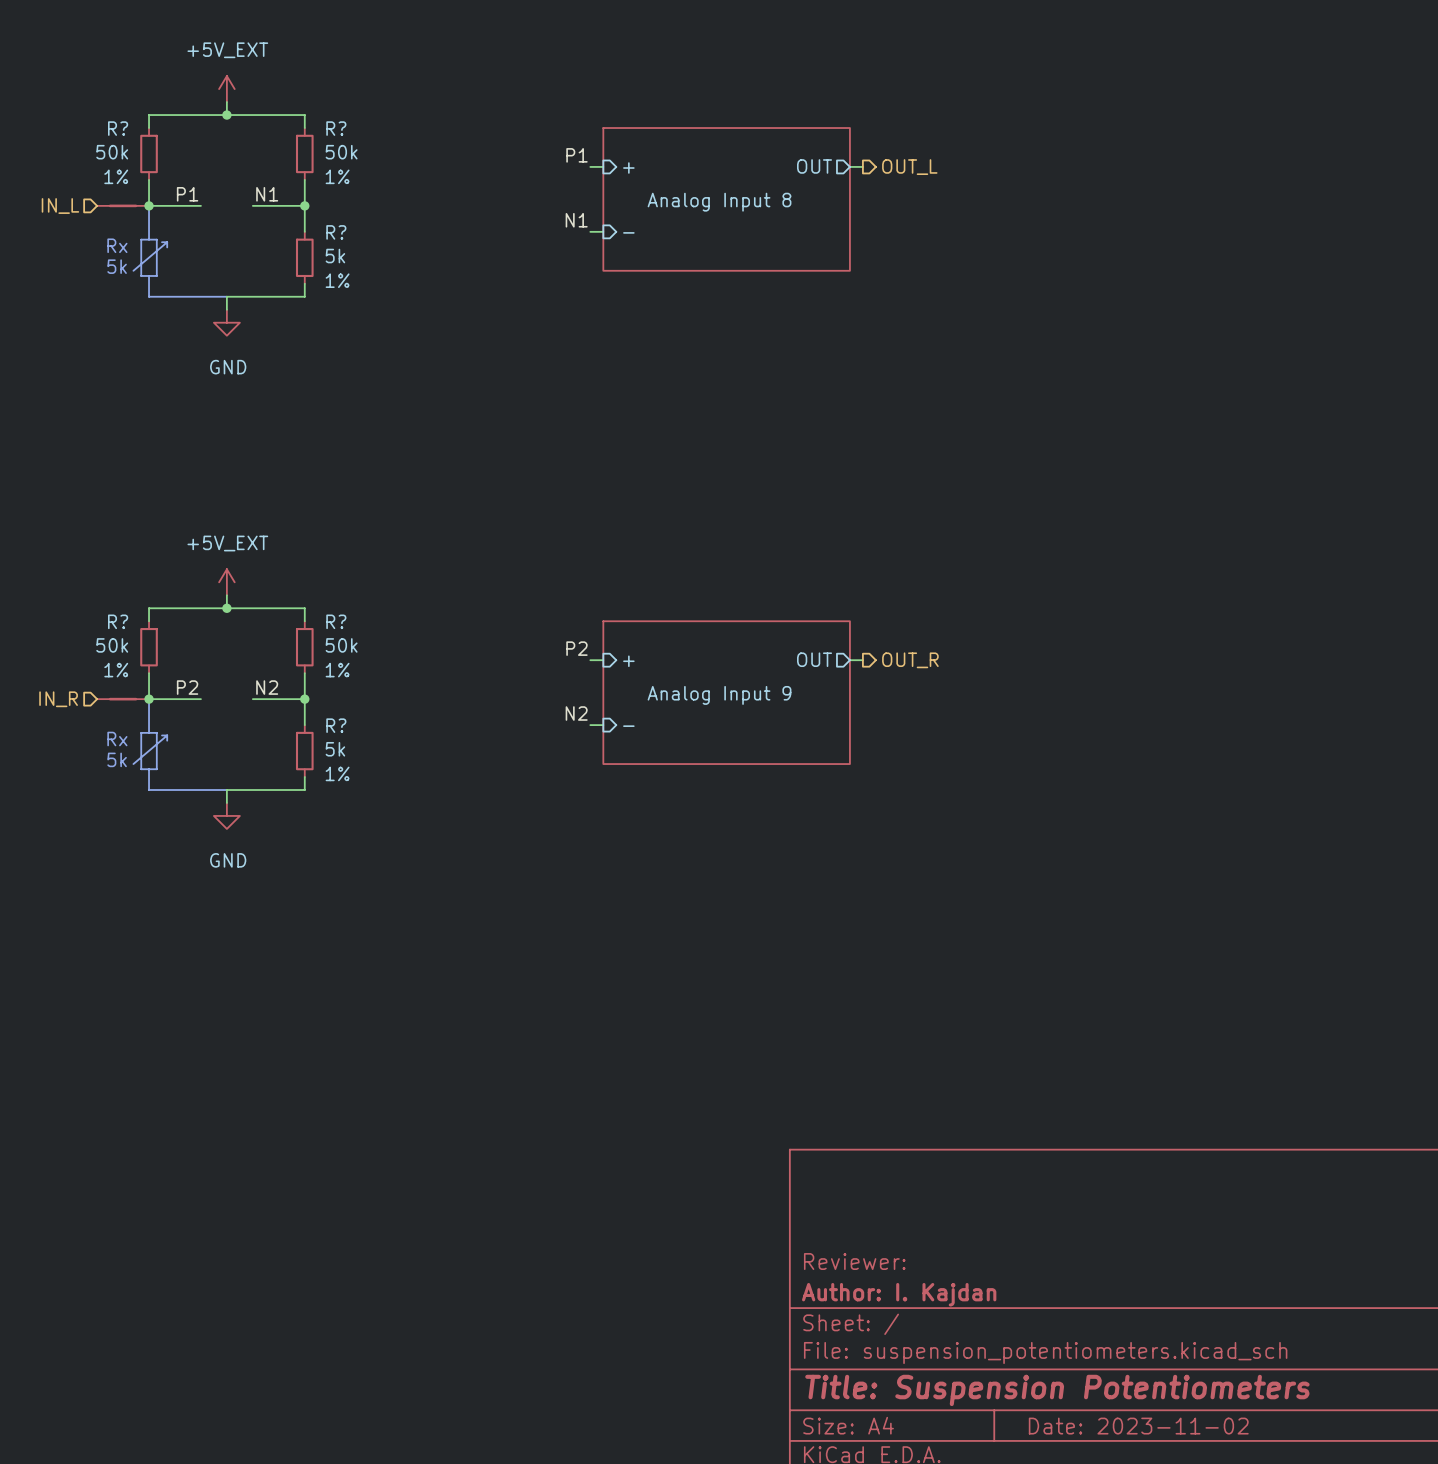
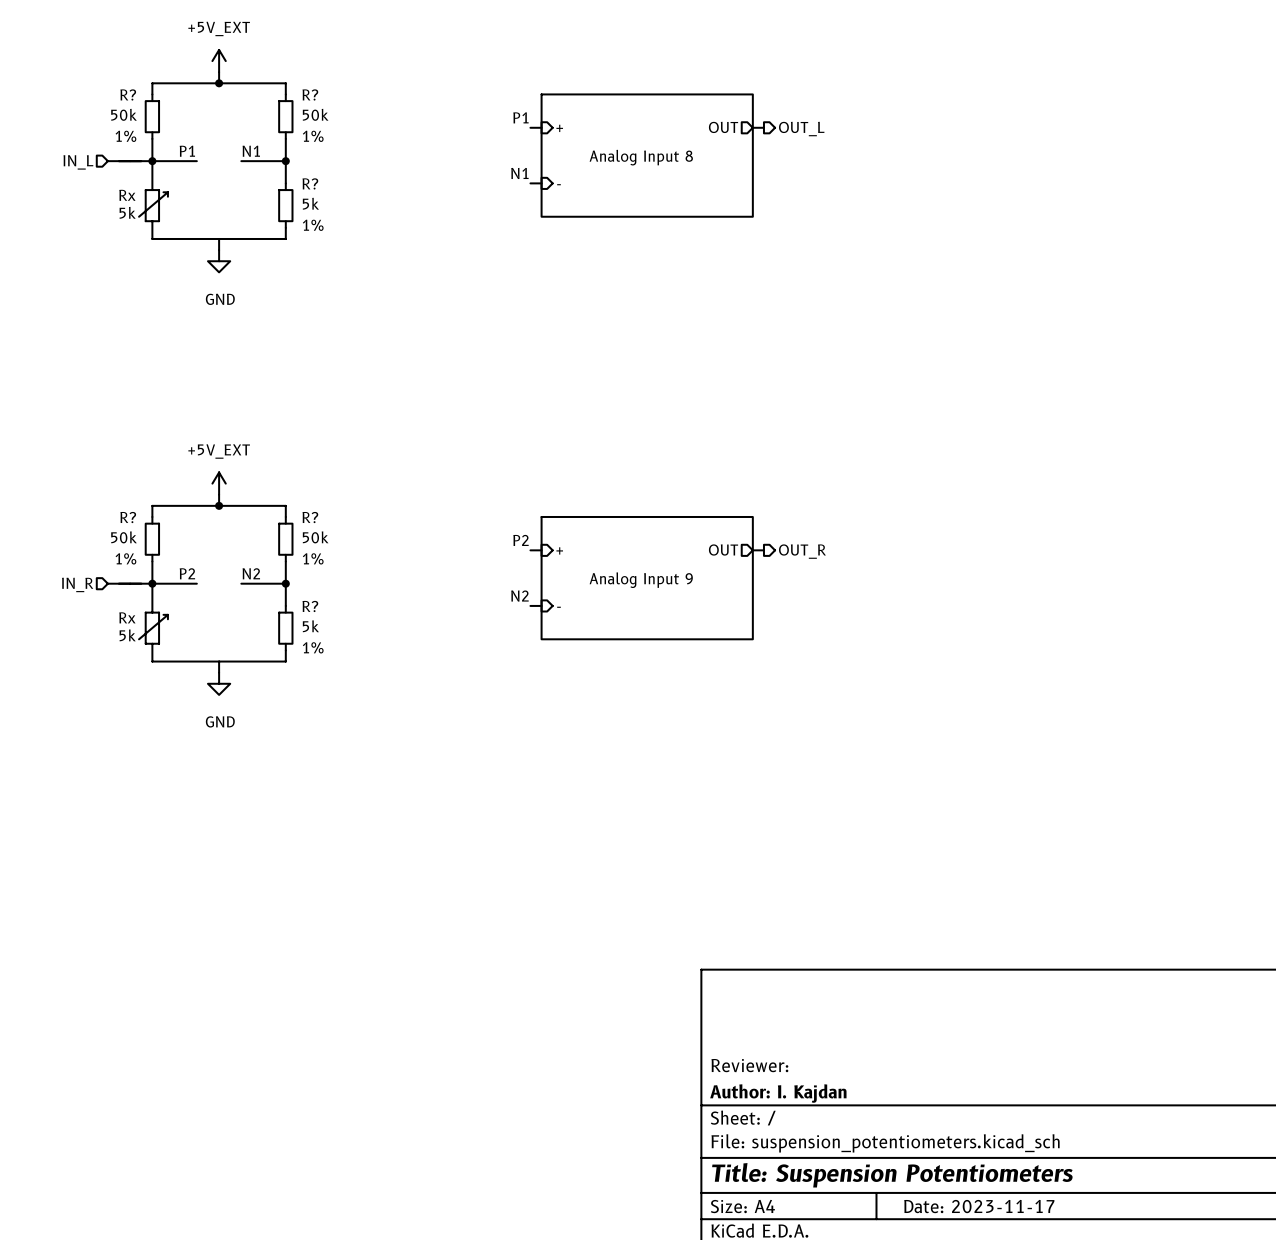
title block: Date: 2023-11-02 (1138, 1426) -> Date: 2023-11-17 (979, 1206)

